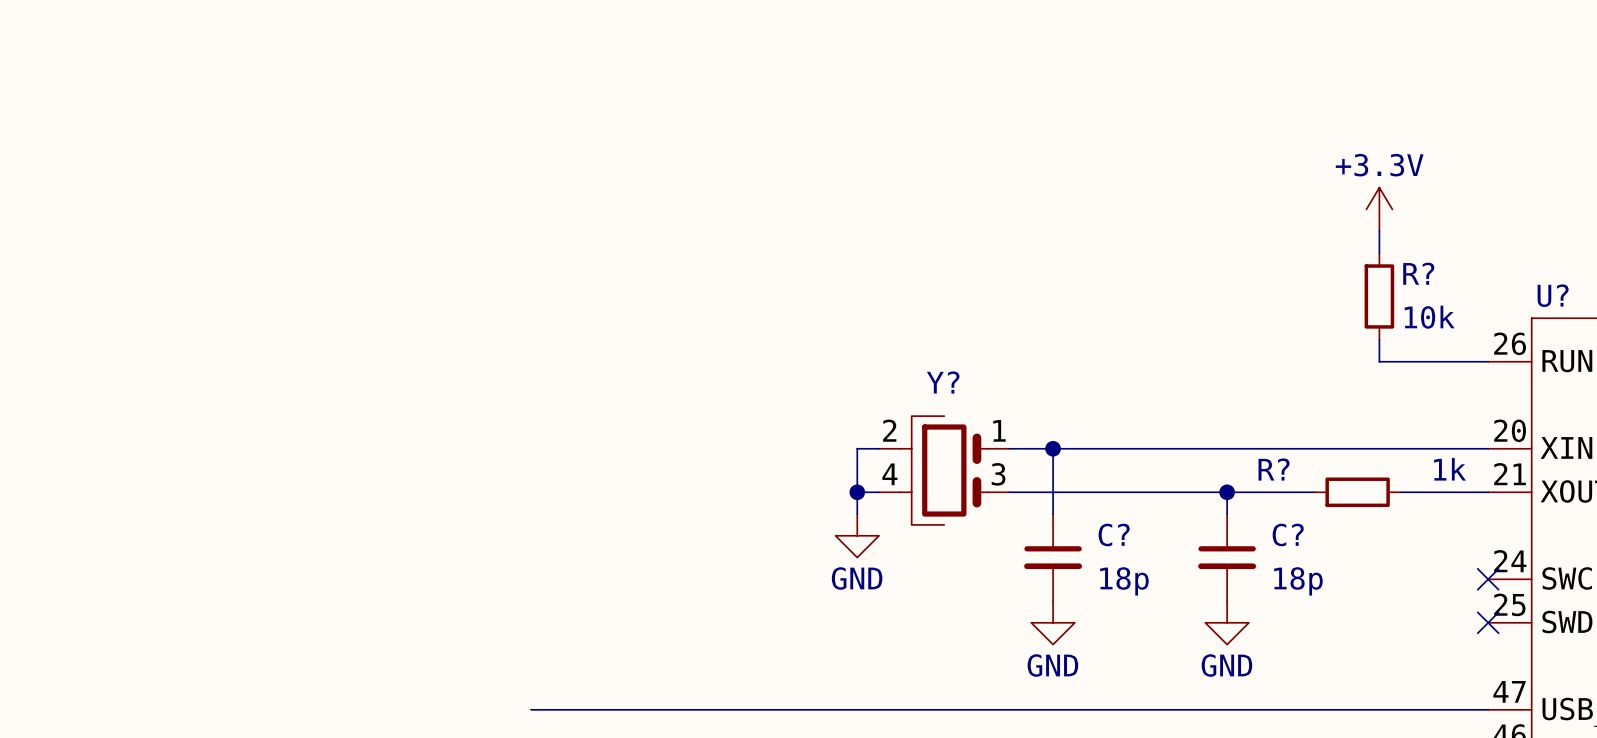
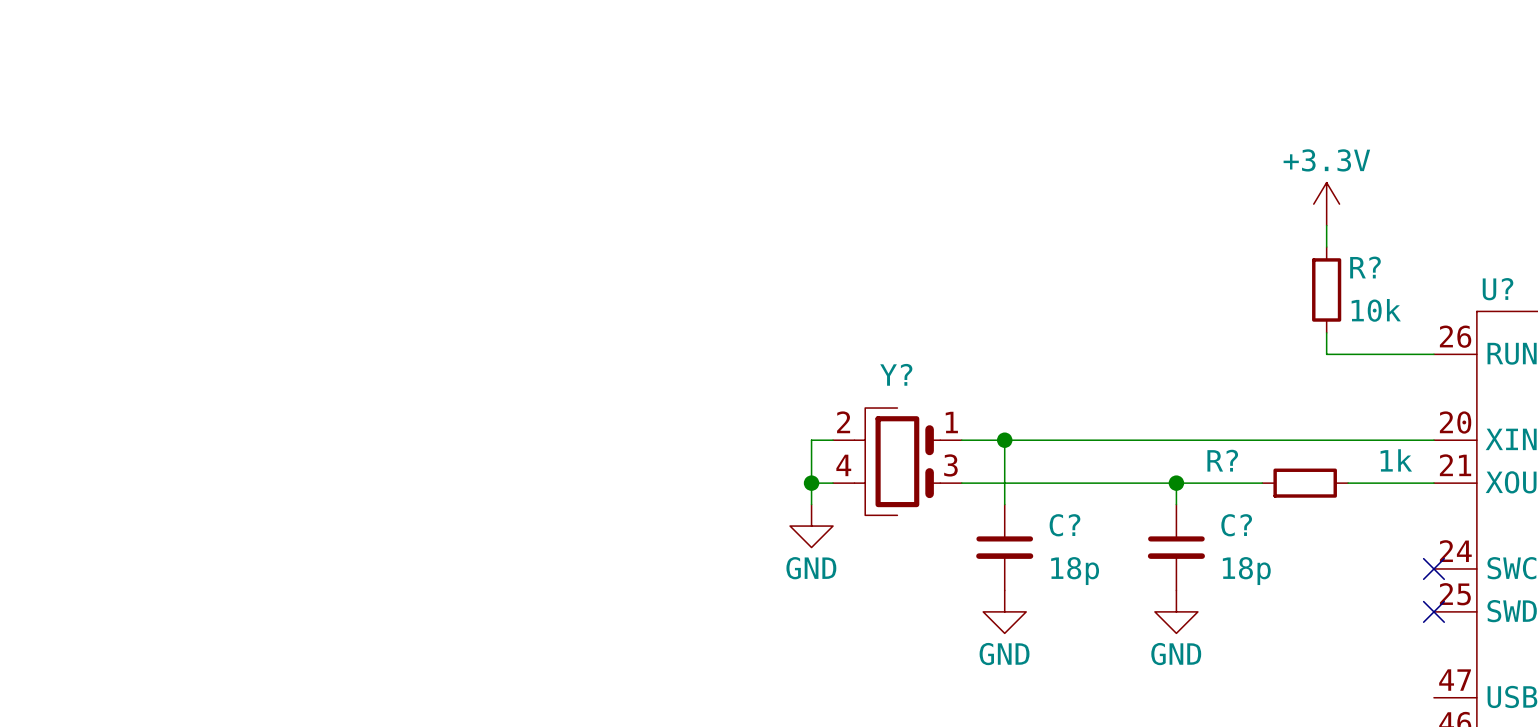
wire: (530, 709) (1488, 709) -> none

